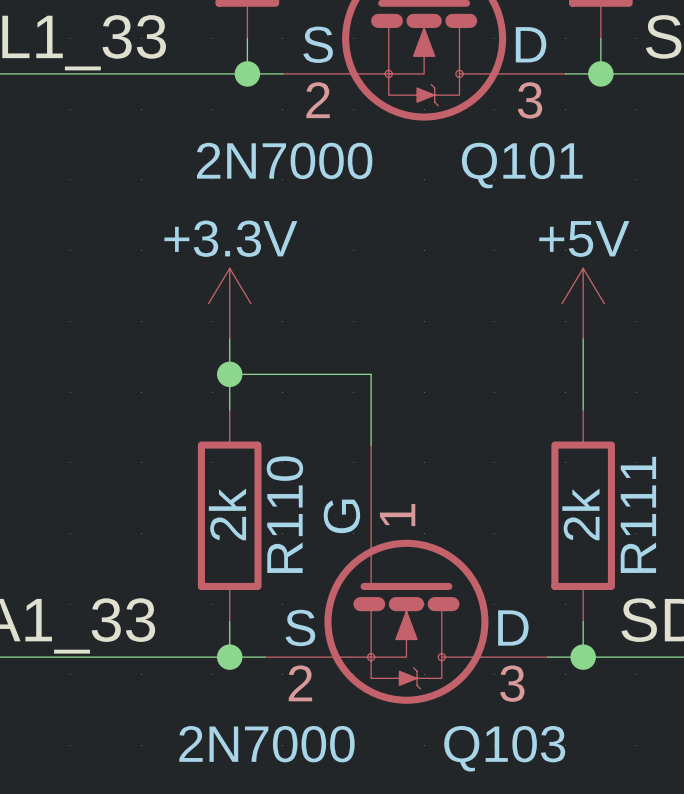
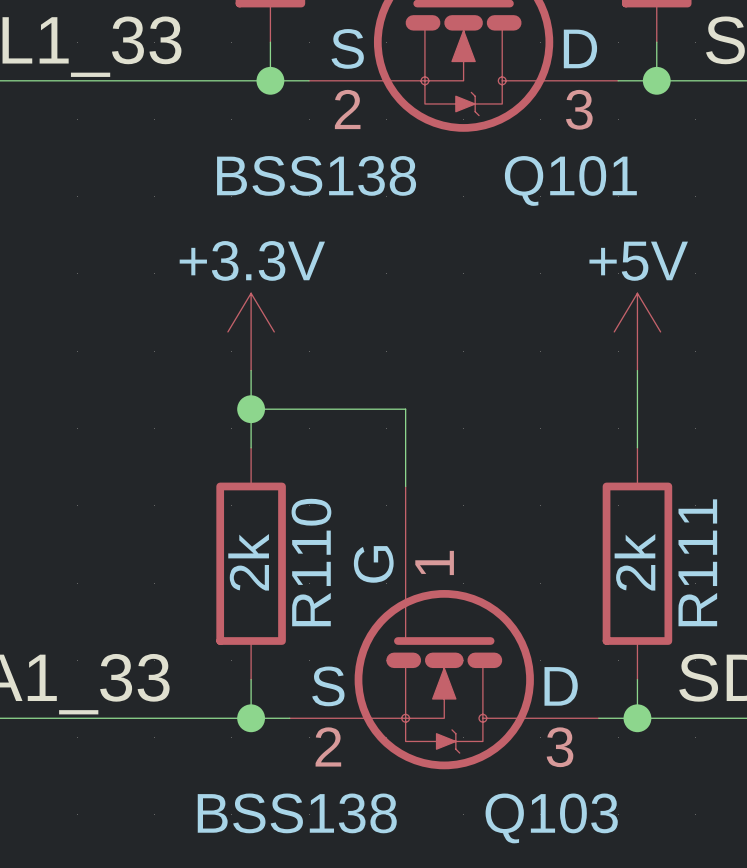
Q101 value: 2N7000 (284, 160) -> BSS138 (316, 175)
Q103 value: 2N7000 (266, 744) -> BSS138 (297, 813)

